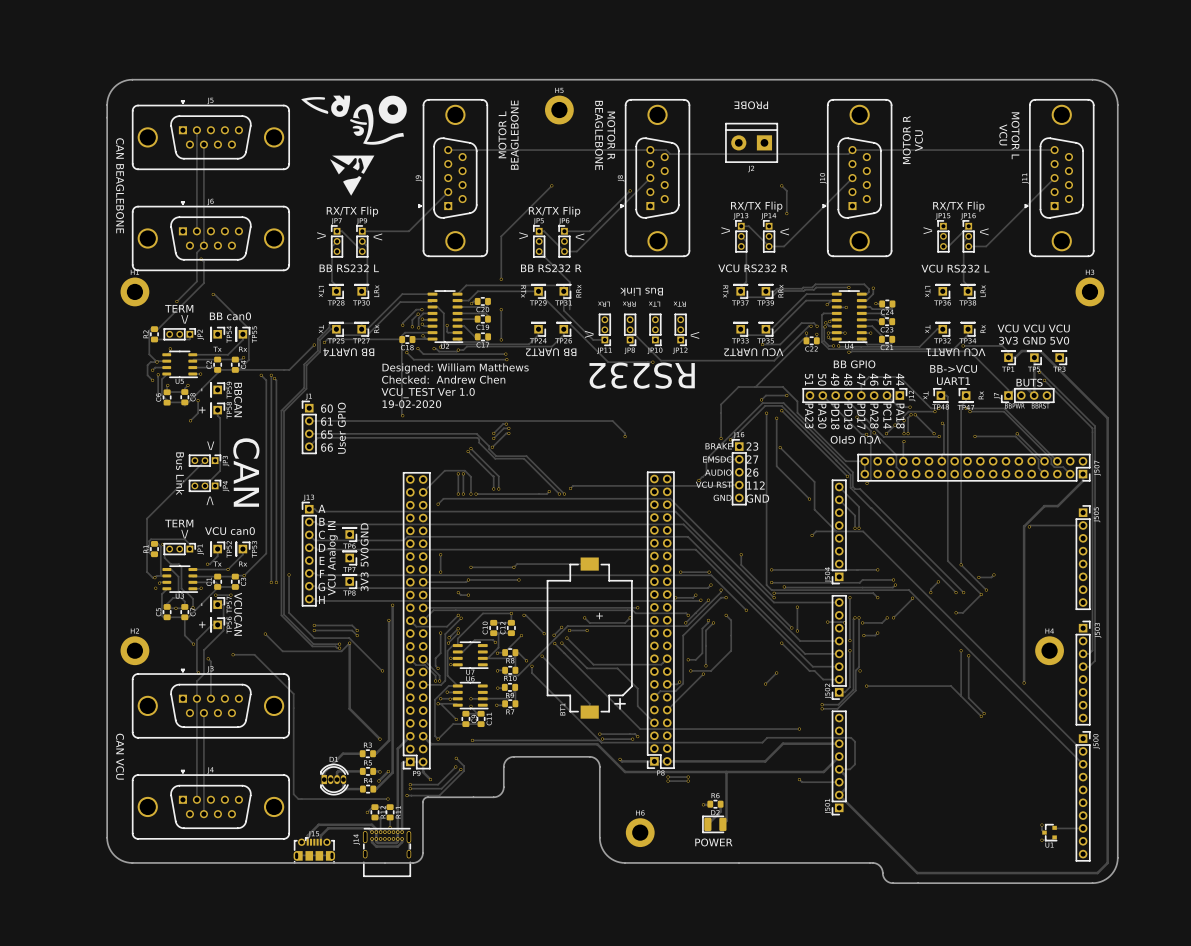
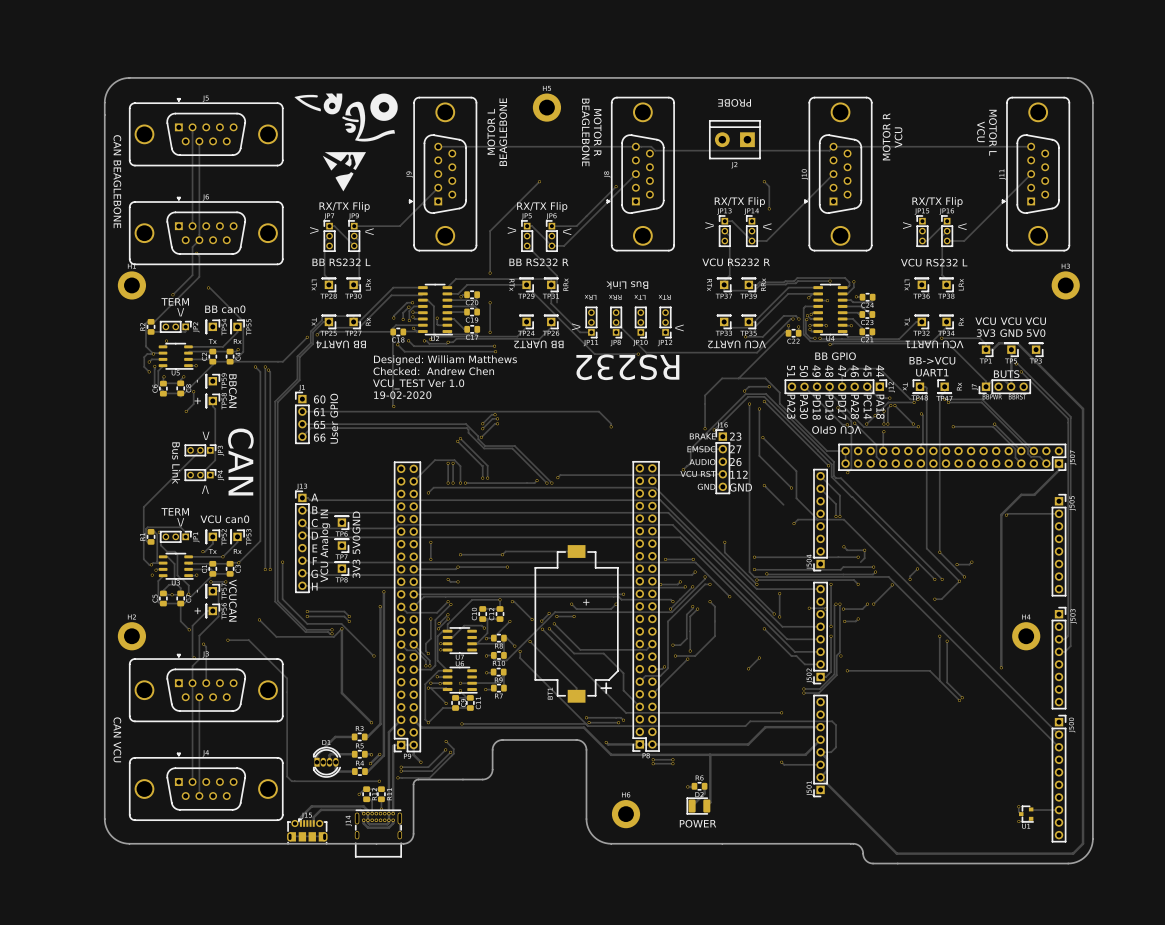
track: none -> (764, 485) (783, 504)
via: none -> (764, 485)
track: none -> (843, 546) (847, 550) (864, 550) (864, 558) (860, 562)
via: none -> (843, 546)
via: none -> (864, 550)

